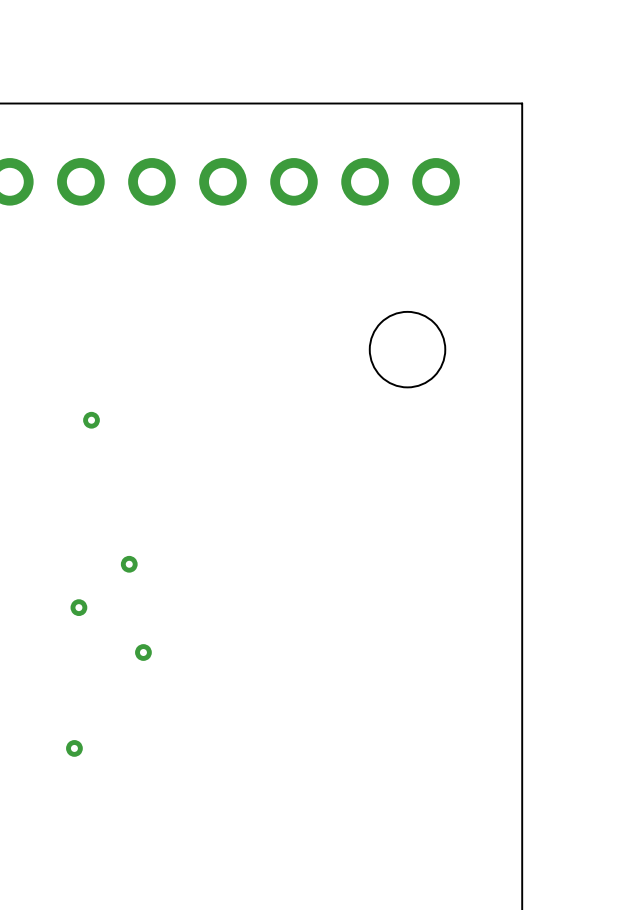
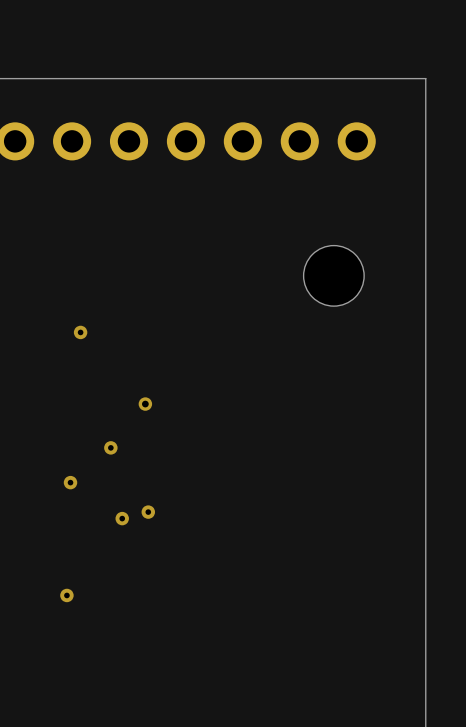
via: none -> (145, 404)
via: none -> (148, 512)

